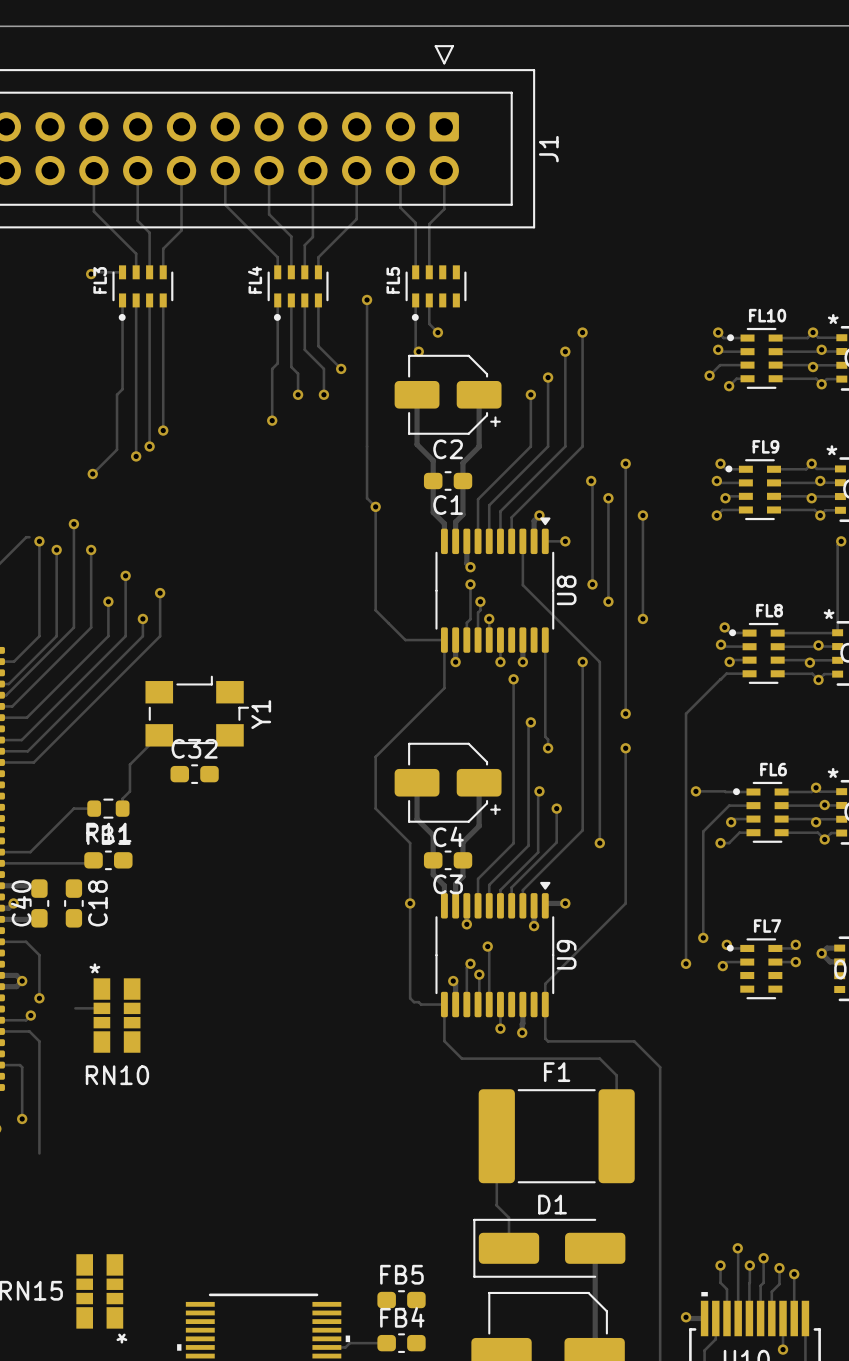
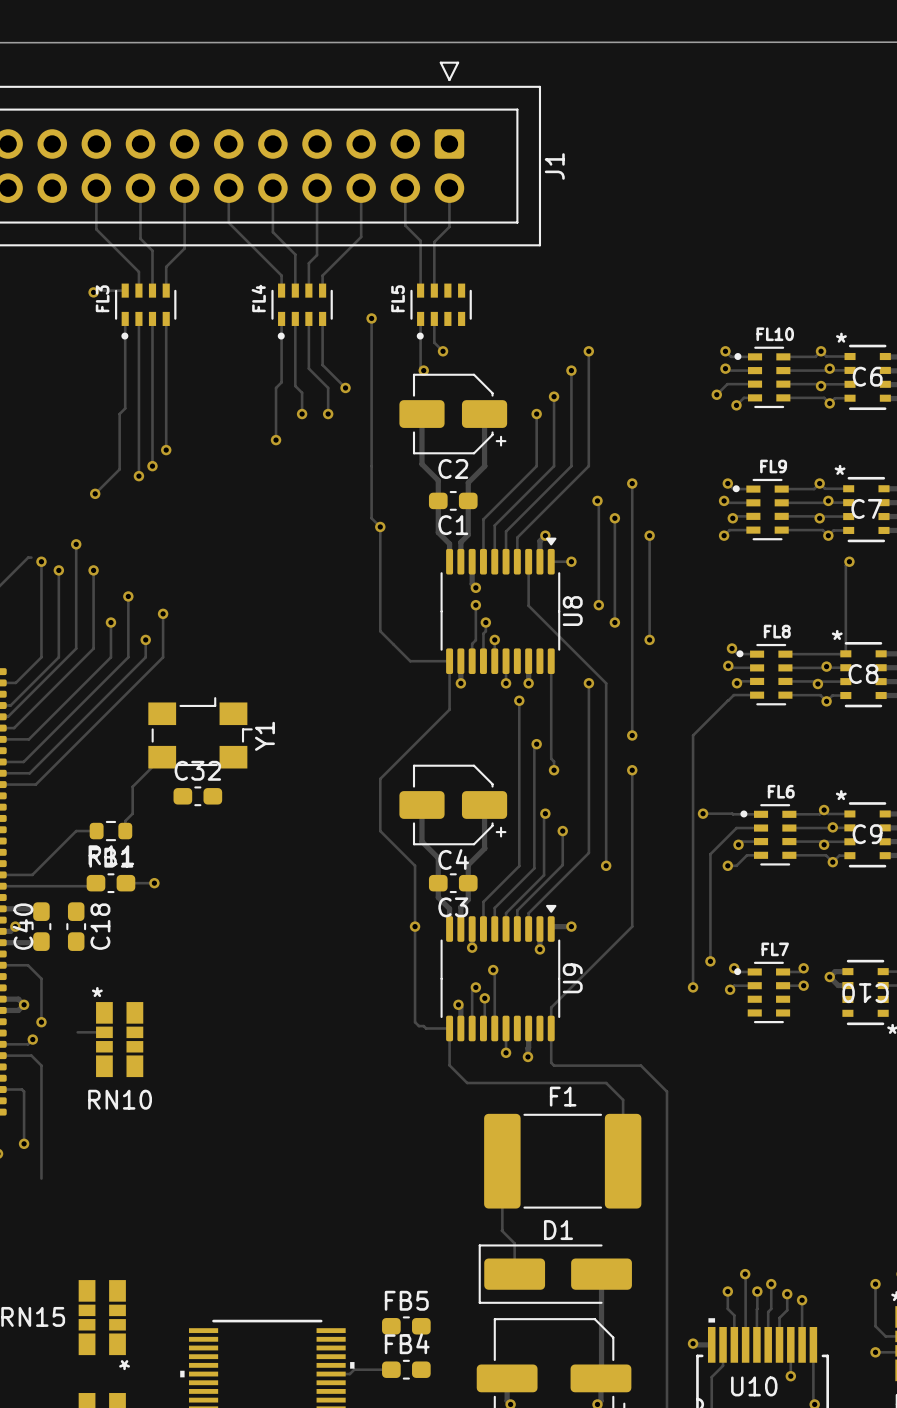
track: none -> (125, 883) (154, 883)
via: none -> (154, 883)

